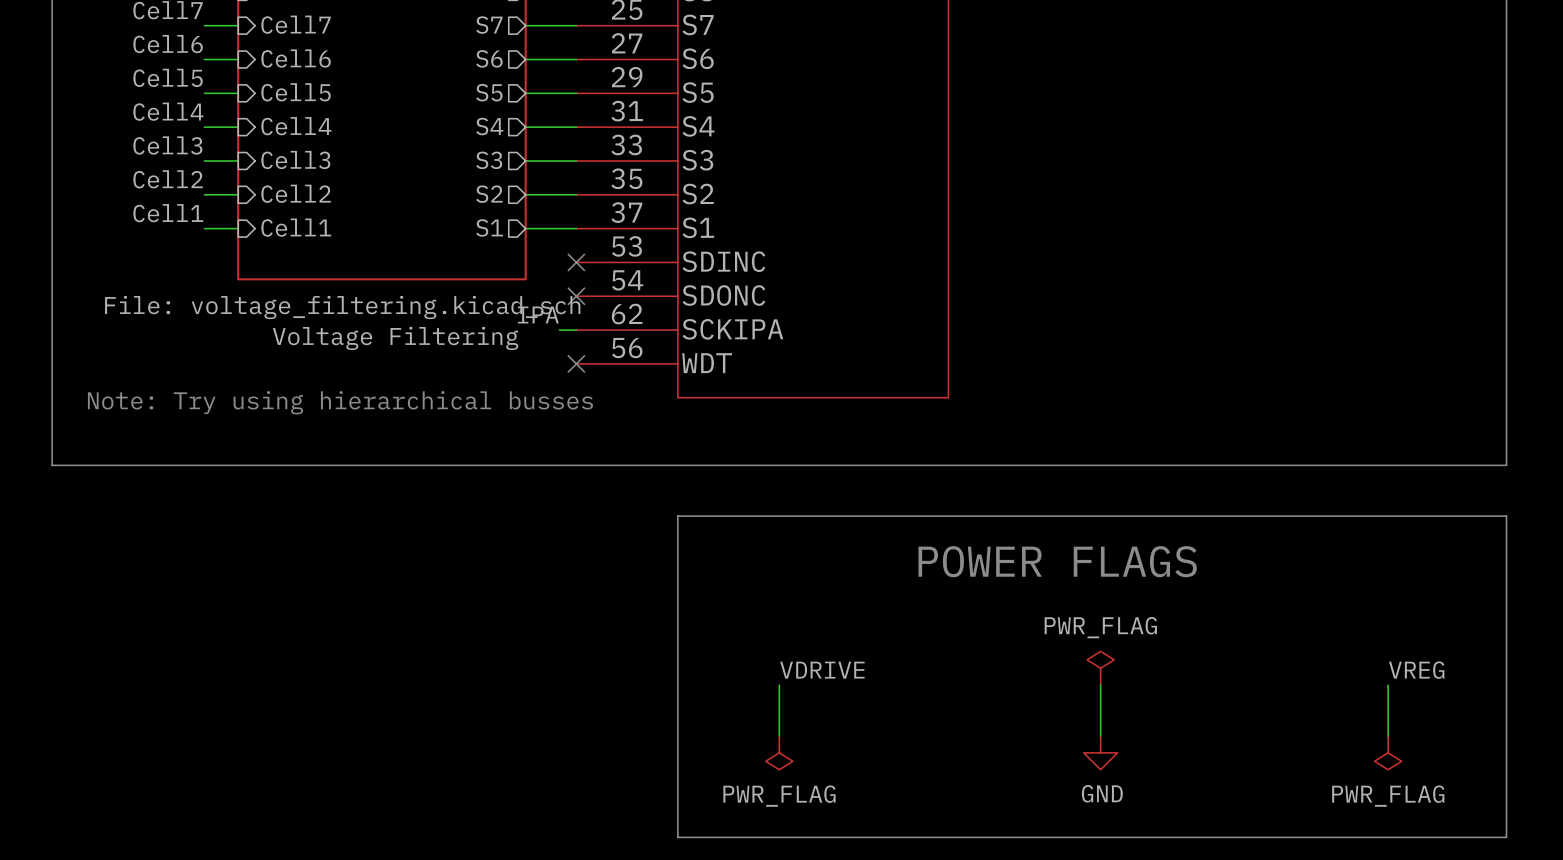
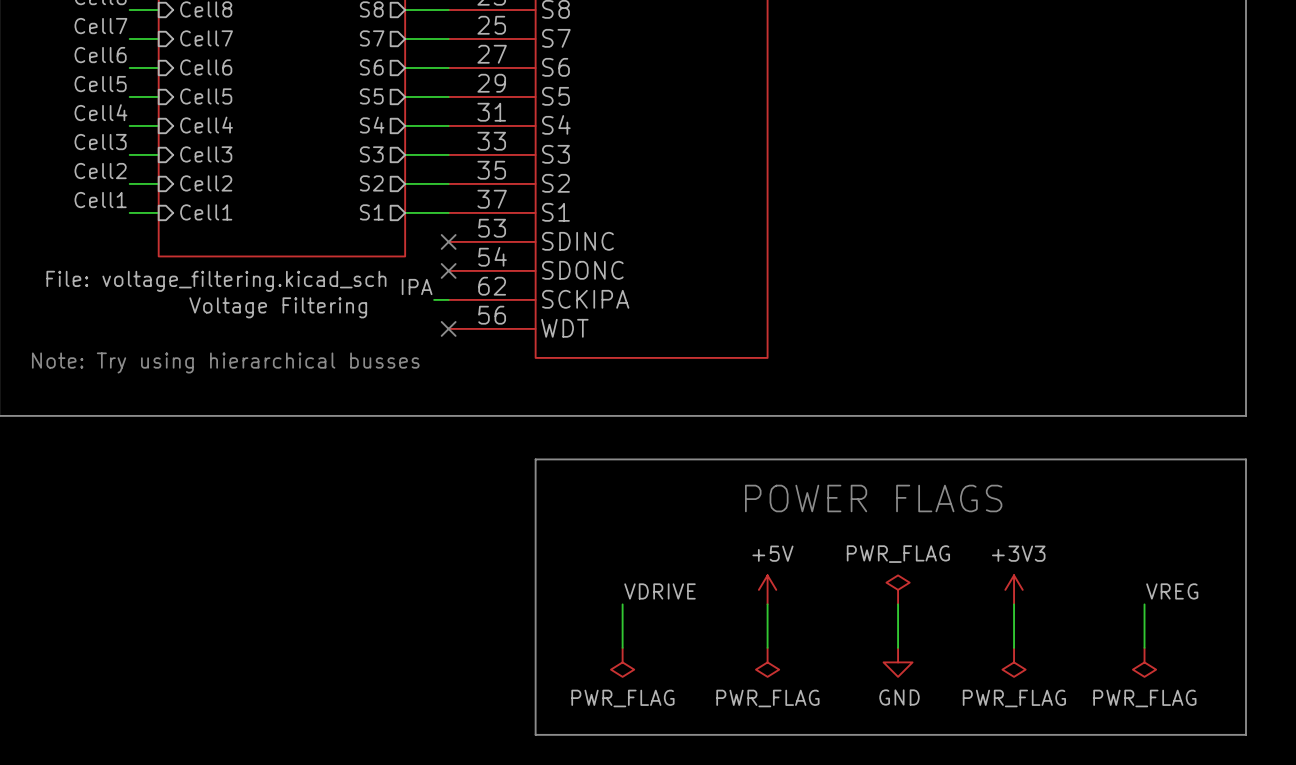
power symbol: none -> +5V (767, 589)
power symbol: none -> +3V3 (1014, 589)
wire: none -> (767, 604) (767, 647)
wire: none -> (1014, 604) (1014, 647)
power symbol: none -> PWR_FLAG (767, 662)
power symbol: none -> PWR_FLAG (1014, 662)

